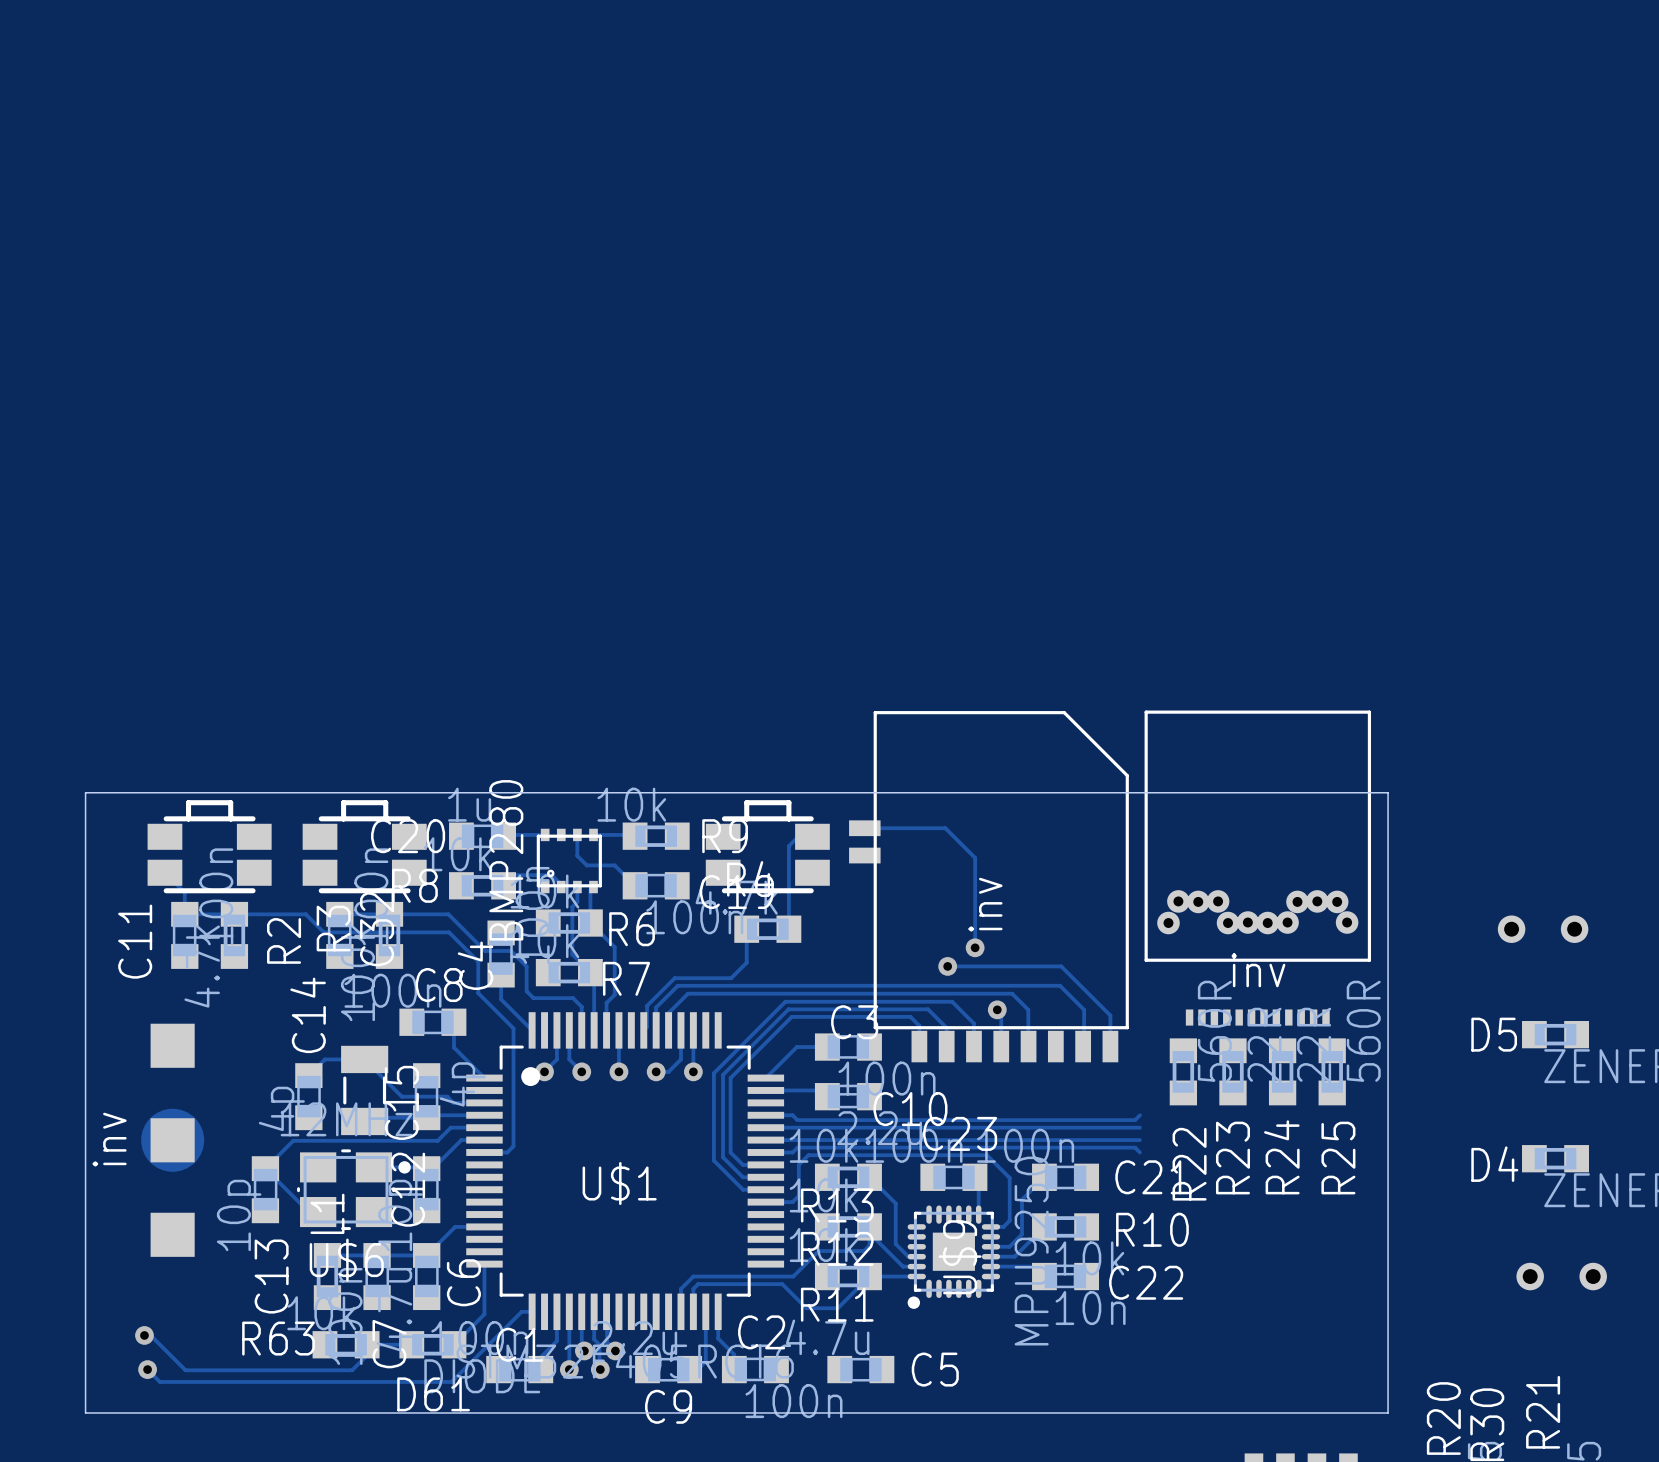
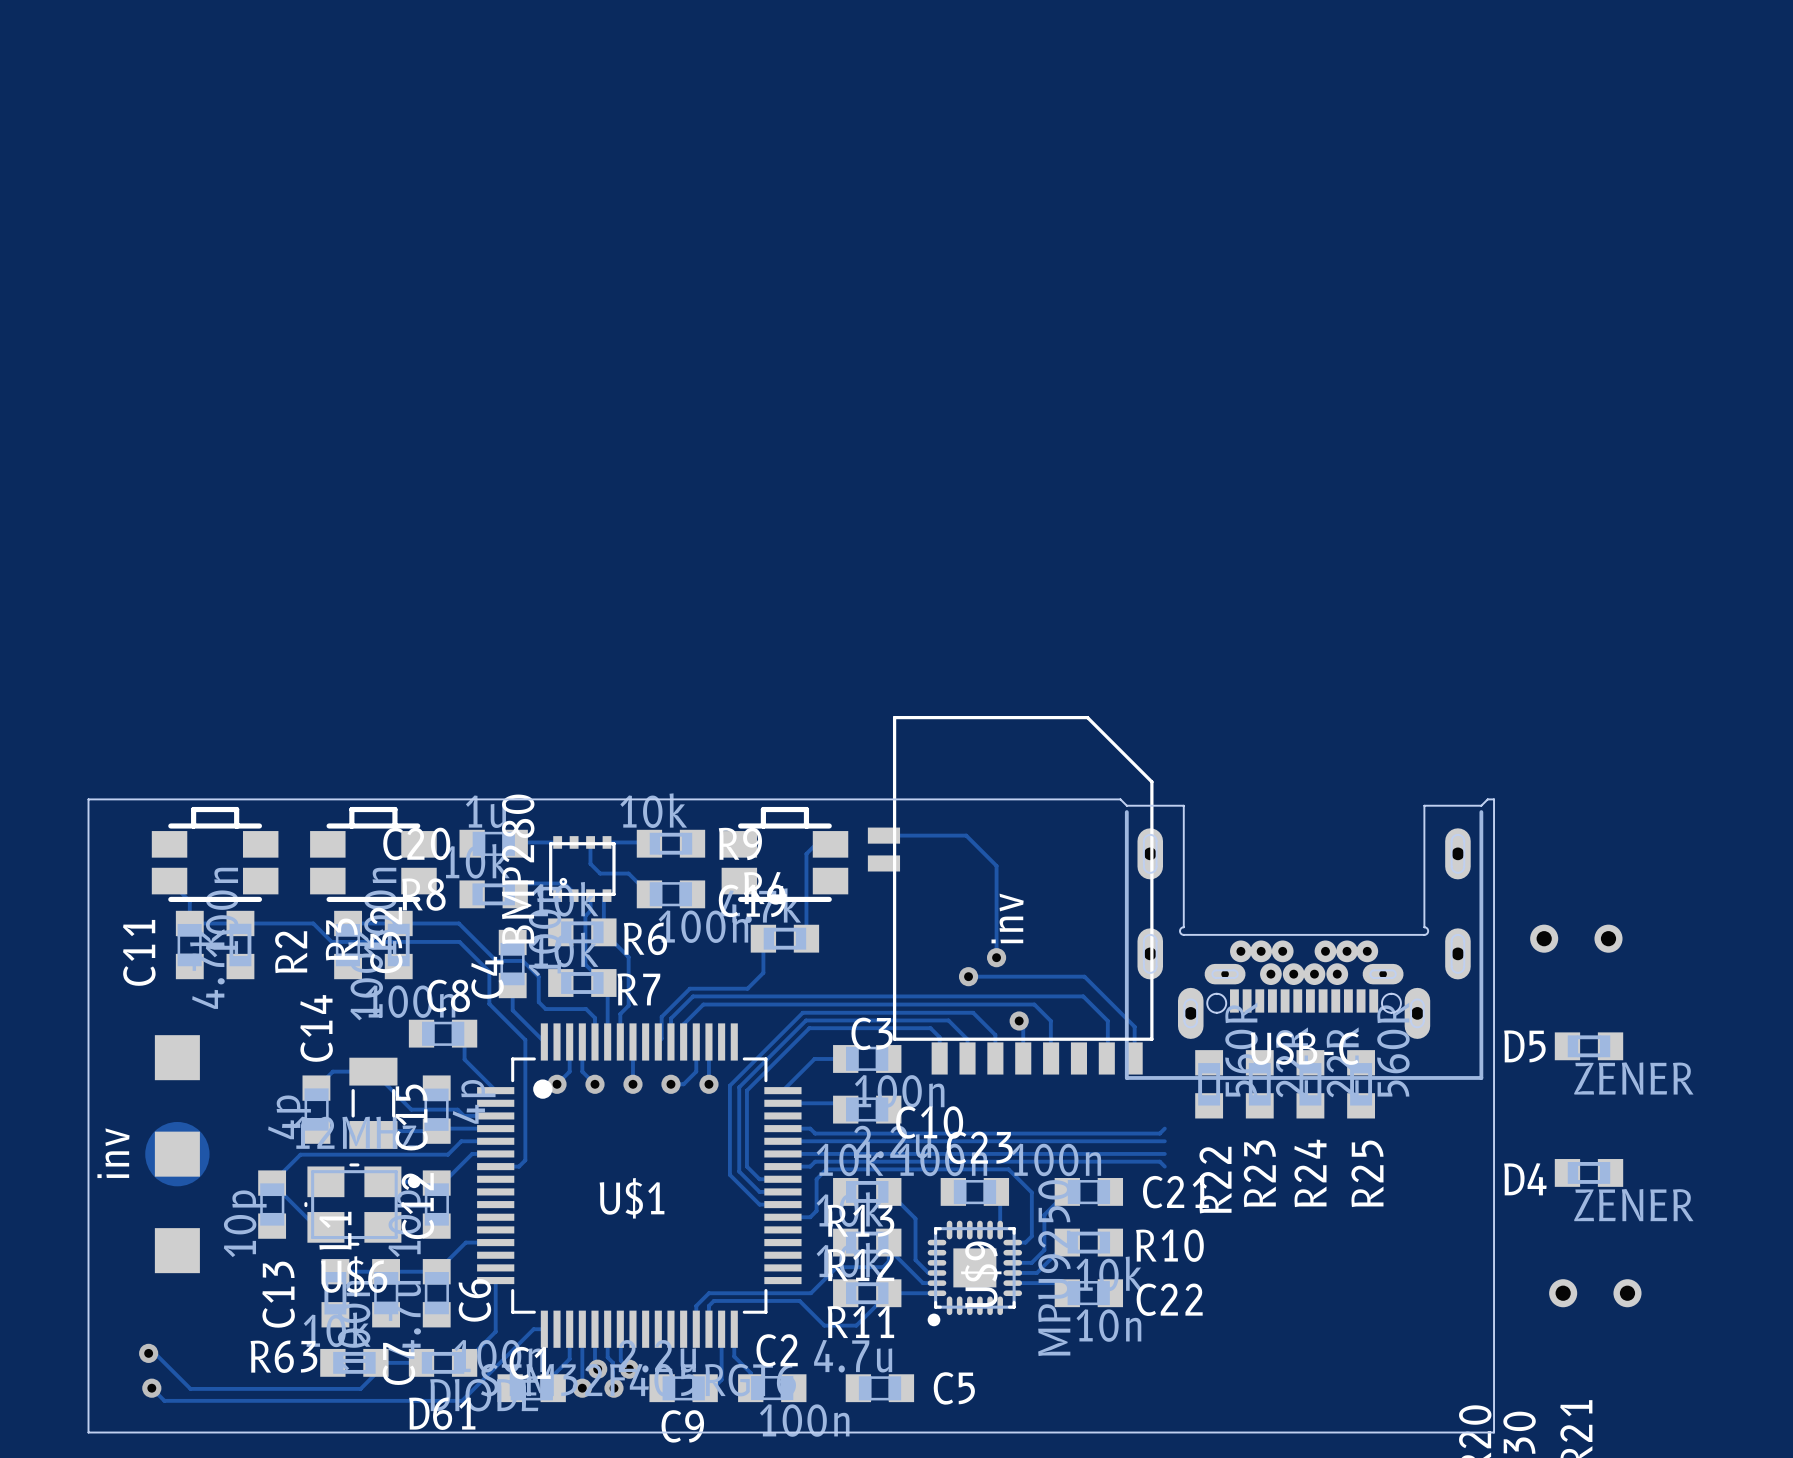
board edge: (1096, 792) (1388, 792) (1388, 1412) -> (1481, 805) (1487, 799) (1494, 799) (1494, 1432) (1418, 1432)
board edge: none -> (1120, 799) (1126, 805)
part: (1257, 868) -> none
part: none -> (1304, 942)

